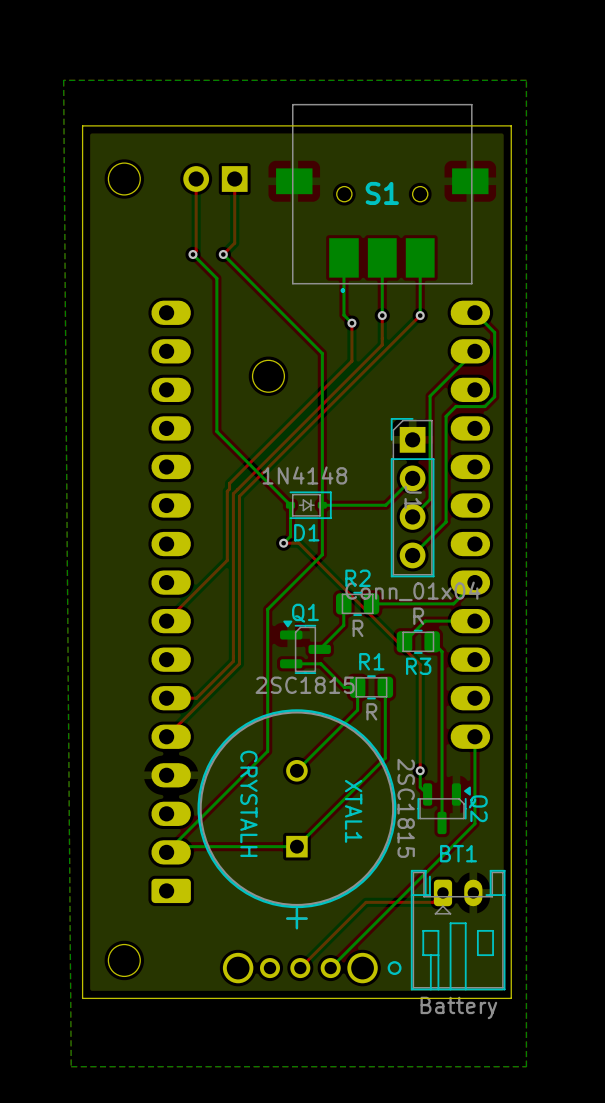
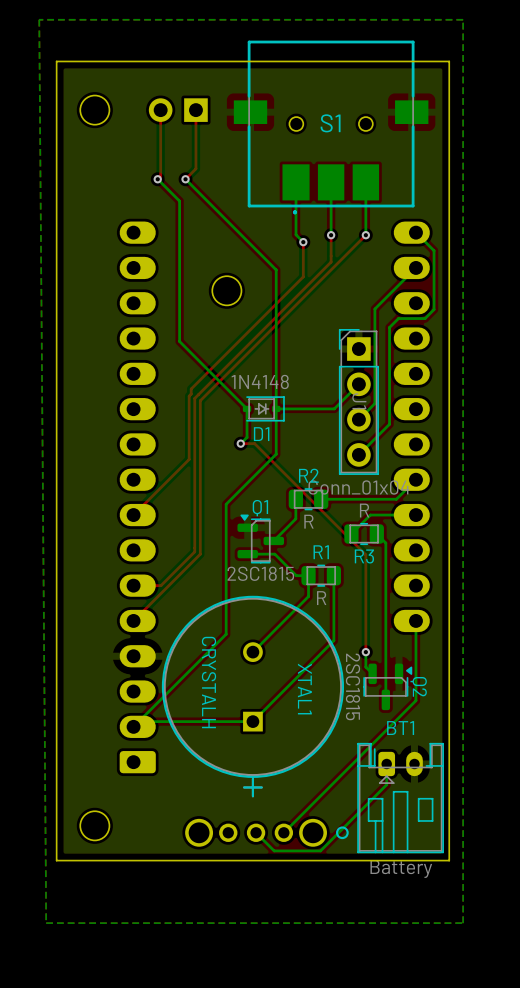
S1 footprint: [276, 103, 489, 293] -> [233, 40, 429, 215]
bottom track: none -> (386, 764) (386, 784) (320, 850) (274, 850) (256, 832)
top track: (442, 892) (433, 902) (366, 902) (300, 968) -> none

